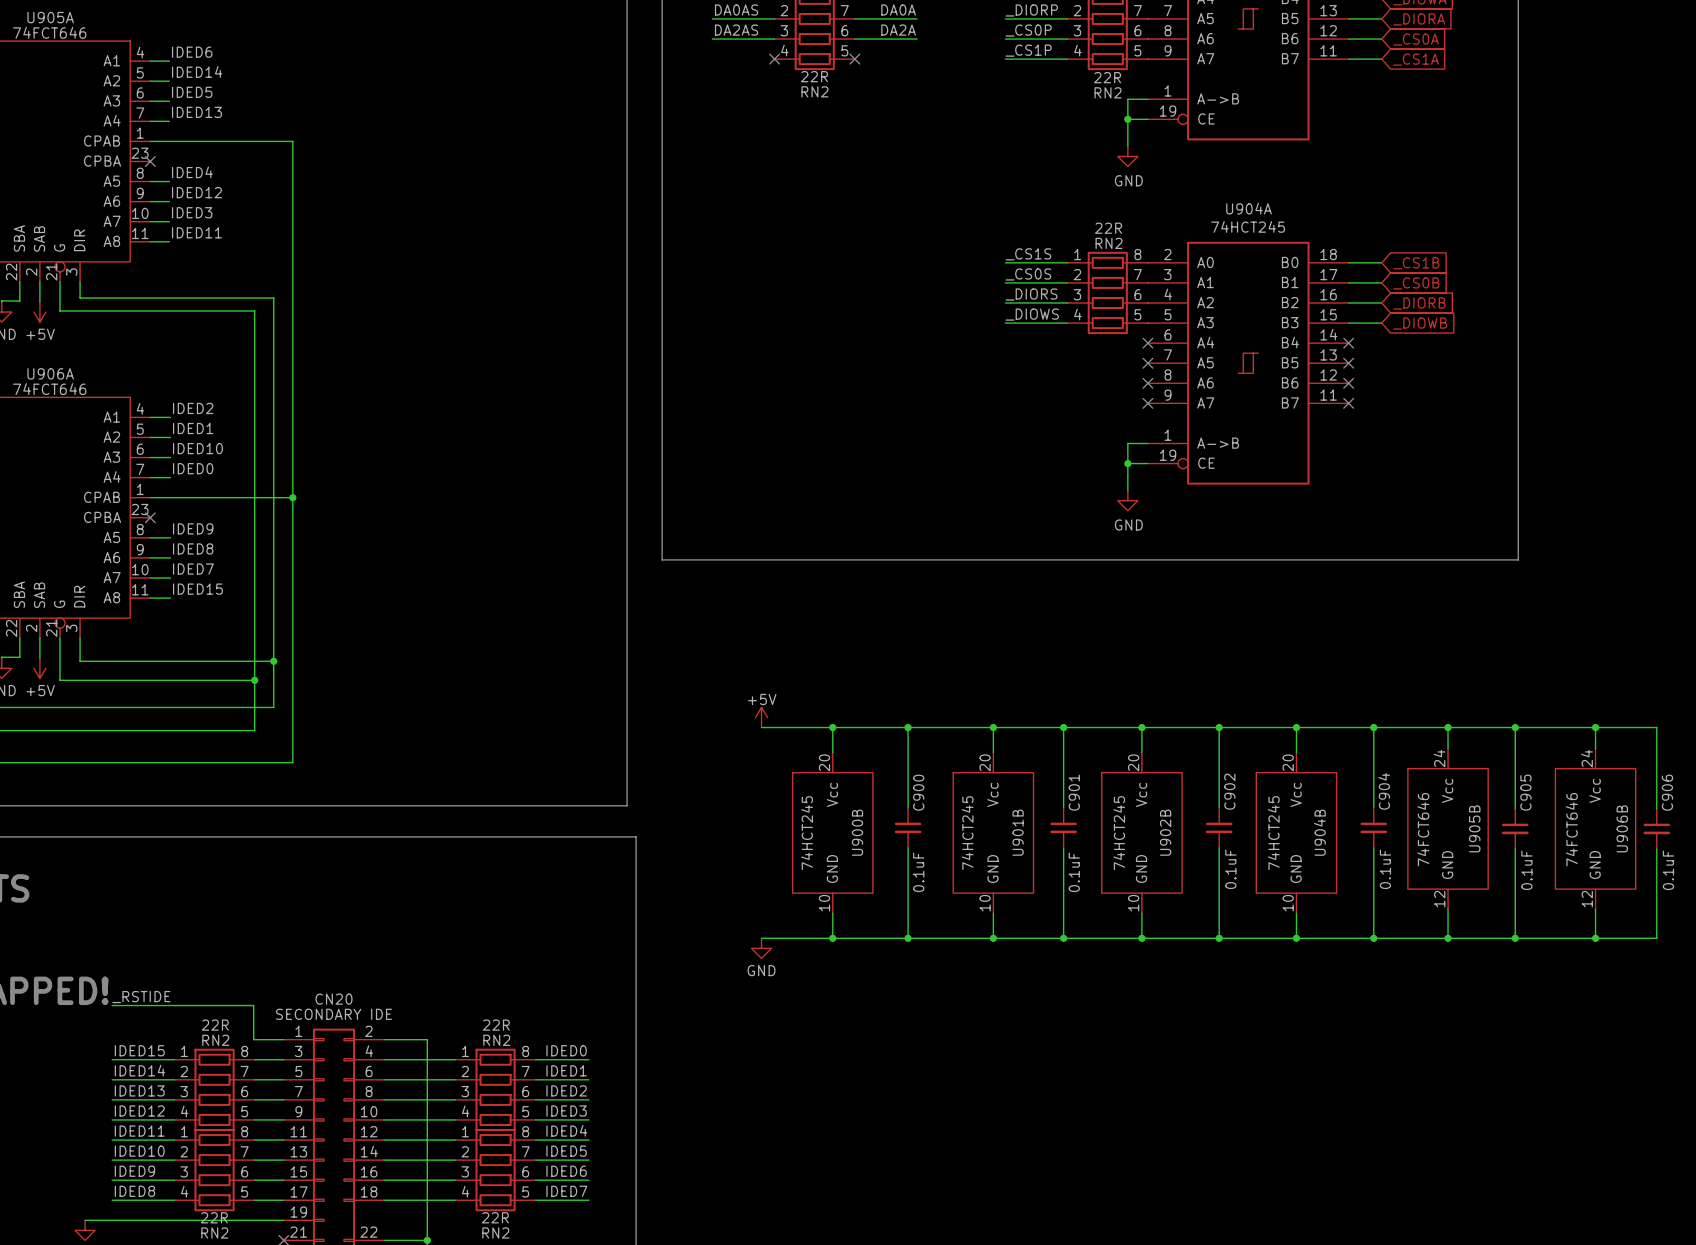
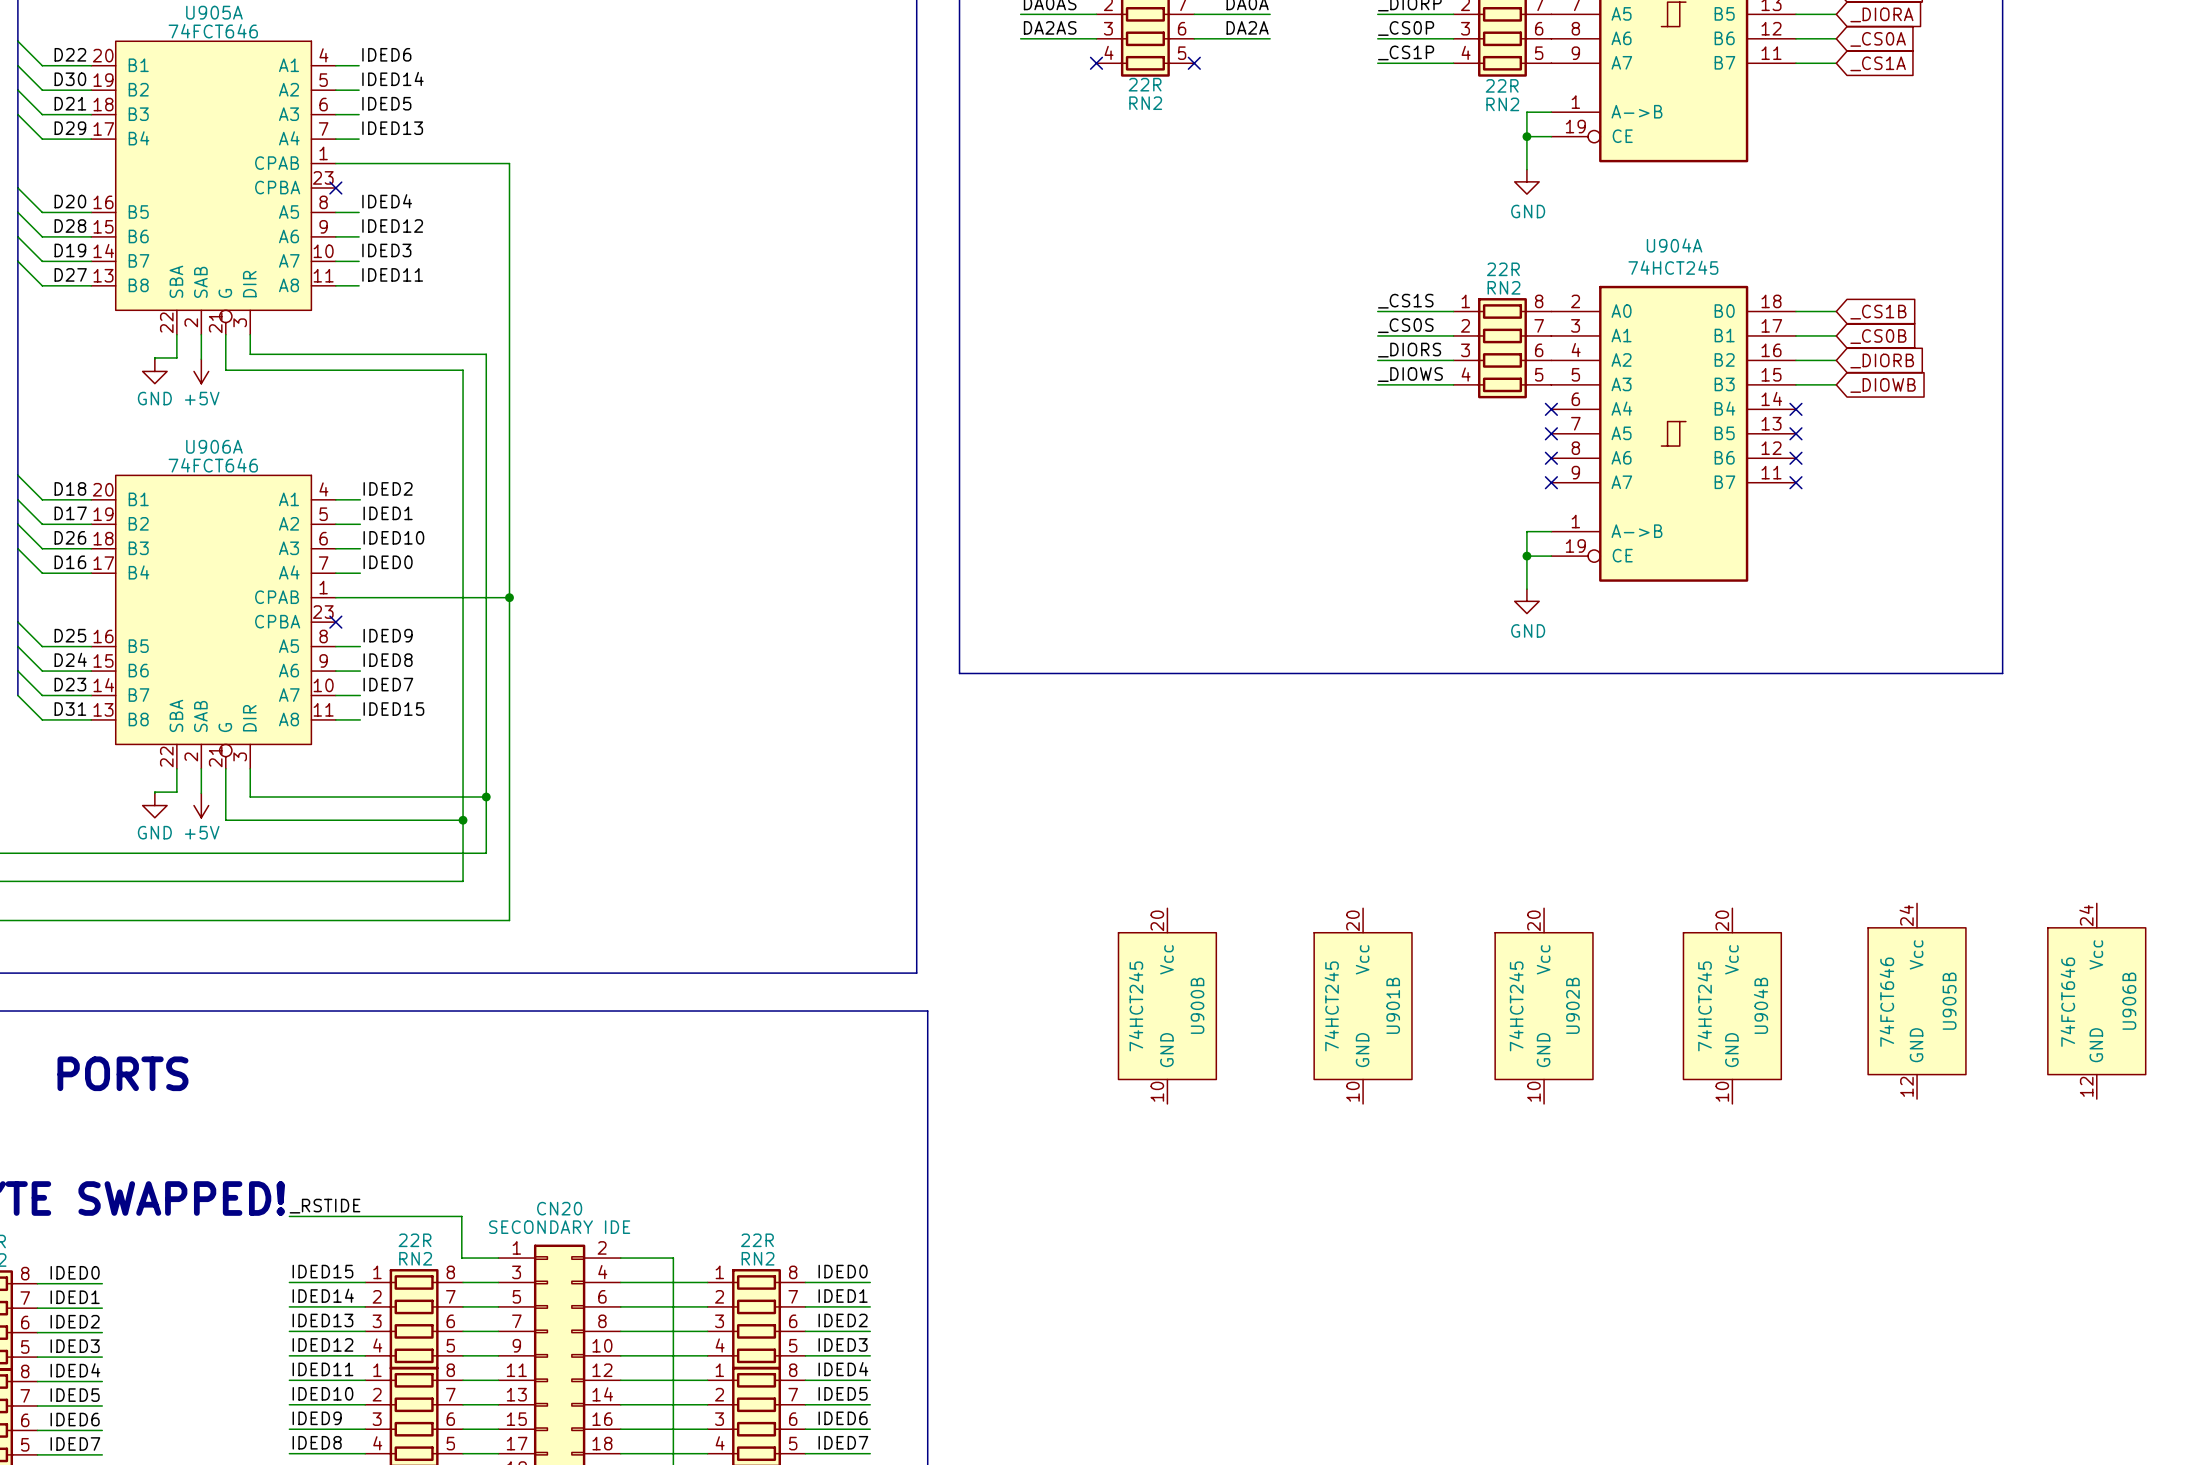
power symbol: +5V (761, 717) -> none
wire: (761, 727) (1656, 727) (1656, 808) -> none
wire: (832, 727) (832, 752) -> none
junction: (832, 727) -> none
wire: (908, 727) (908, 807) -> none
junction: (908, 727) -> none
wire: (993, 727) (993, 752) -> none
junction: (993, 727) -> none
wire: (1063, 727) (1063, 807) -> none
junction: (1063, 727) -> none
wire: (1141, 727) (1141, 752) -> none
junction: (1141, 727) -> none
wire: (1219, 727) (1219, 807) -> none
junction: (1219, 727) -> none
wire: (1296, 727) (1296, 752) -> none
junction: (1296, 727) -> none
wire: (1373, 727) (1373, 807) -> none
junction: (1373, 727) -> none
wire: (1448, 727) (1448, 748) -> none
junction: (1448, 727) -> none
wire: (1515, 727) (1515, 808) -> none
junction: (1515, 727) -> none
wire: (1595, 727) (1595, 748) -> none
junction: (1595, 727) -> none
C900: 0.1uF (908, 827) -> none
C901: 0.1uF (1063, 827) -> none
C902: 0.1uF (1219, 827) -> none
C904: 0.1uF (1373, 827) -> none
C905: 0.1uF (1515, 828) -> none
C906: 0.1uF (1656, 828) -> none
wire: (908, 847) (908, 938) -> none
wire: (1063, 847) (1063, 938) -> none
wire: (1219, 847) (1219, 938) -> none
wire: (1373, 847) (1373, 938) -> none
wire: (1515, 848) (1515, 938) -> none
wire: (1656, 848) (1656, 938) (761, 938) -> none
wire: (1448, 909) (1448, 938) -> none
wire: (1595, 909) (1595, 938) -> none
wire: (832, 913) (832, 938) -> none
wire: (993, 913) (993, 938) -> none
wire: (1141, 913) (1141, 938) -> none
wire: (1296, 913) (1296, 938) -> none
junction: (832, 938) -> none
junction: (908, 938) -> none
junction: (993, 938) -> none
junction: (1063, 938) -> none
junction: (1141, 938) -> none
junction: (1219, 938) -> none
junction: (1296, 938) -> none
junction: (1373, 938) -> none
junction: (1448, 938) -> none
junction: (1515, 938) -> none
junction: (1595, 938) -> none
power symbol: GND (761, 948) -> none

